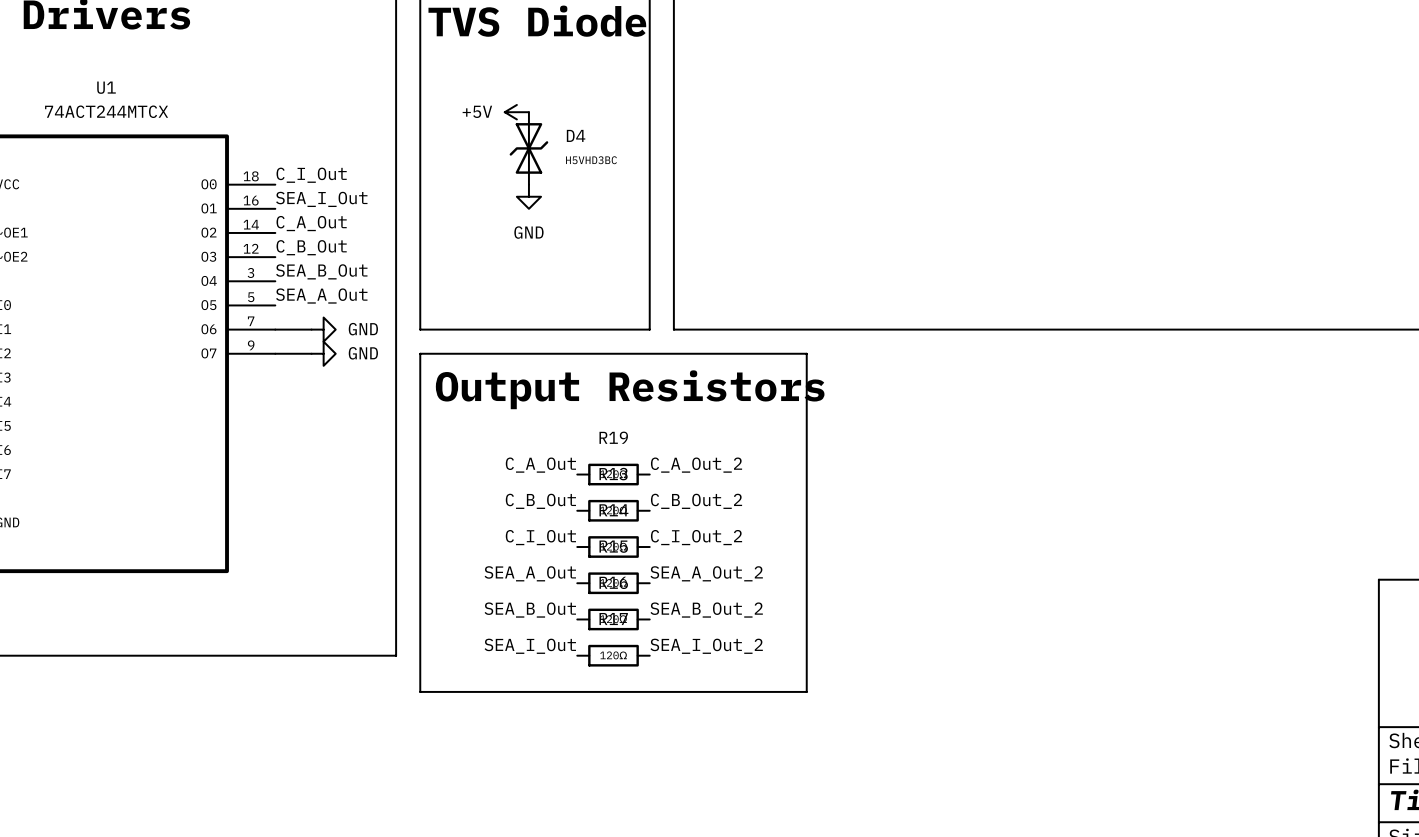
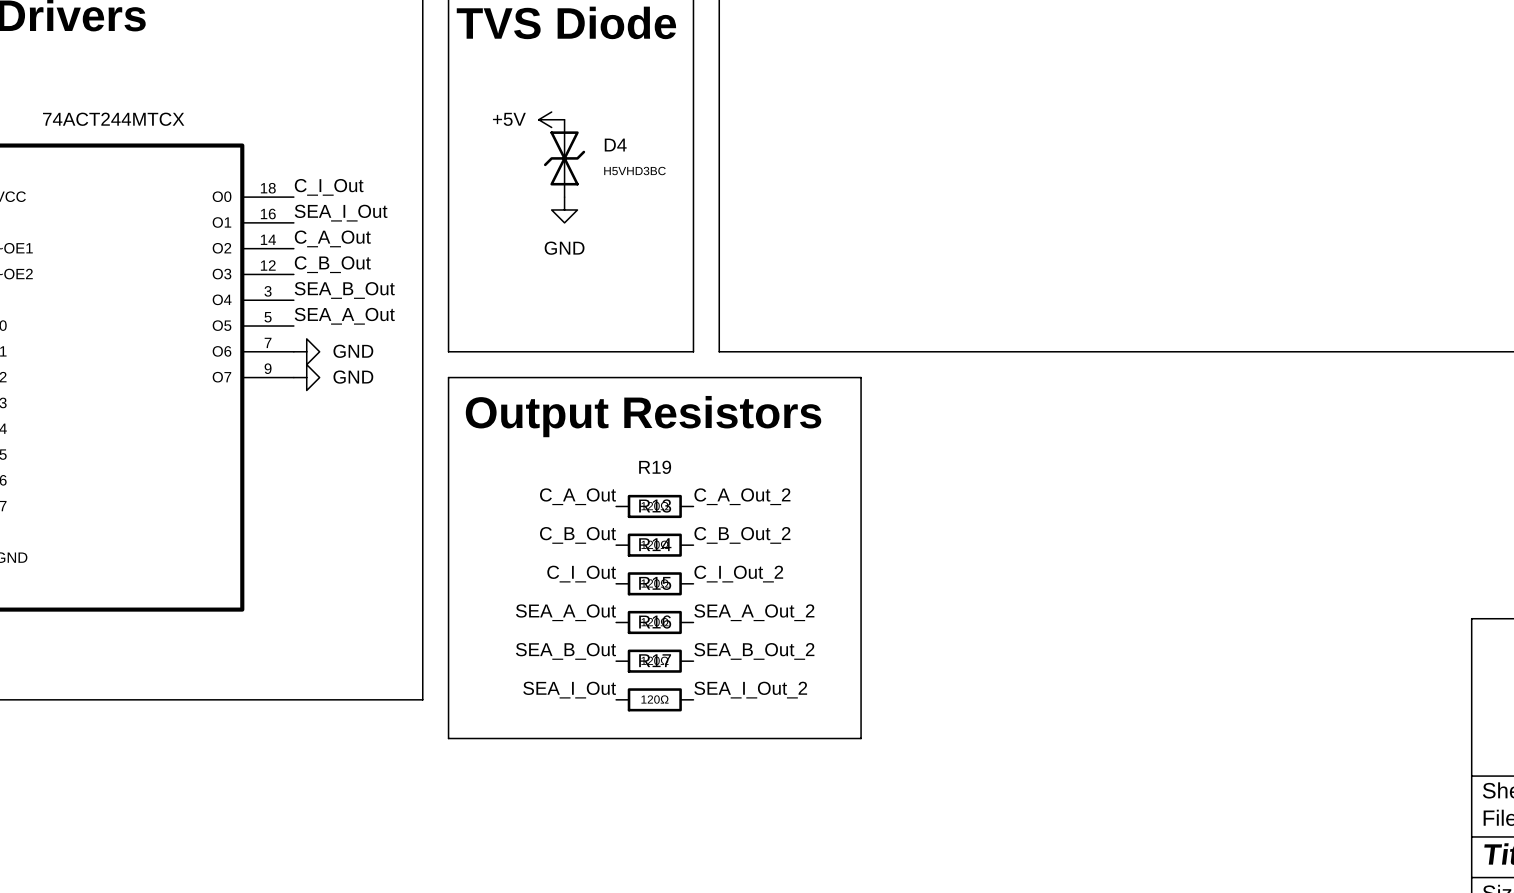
U1 name: U1 (106, 87) -> none
wire: (275, 329) (311, 329) -> none
power symbol: none -> GND (306, 351)
power symbol: GND (323, 329) -> none
wire: (275, 353) (311, 353) -> none
power symbol: none -> GND (306, 377)
power symbol: GND (323, 353) -> none

